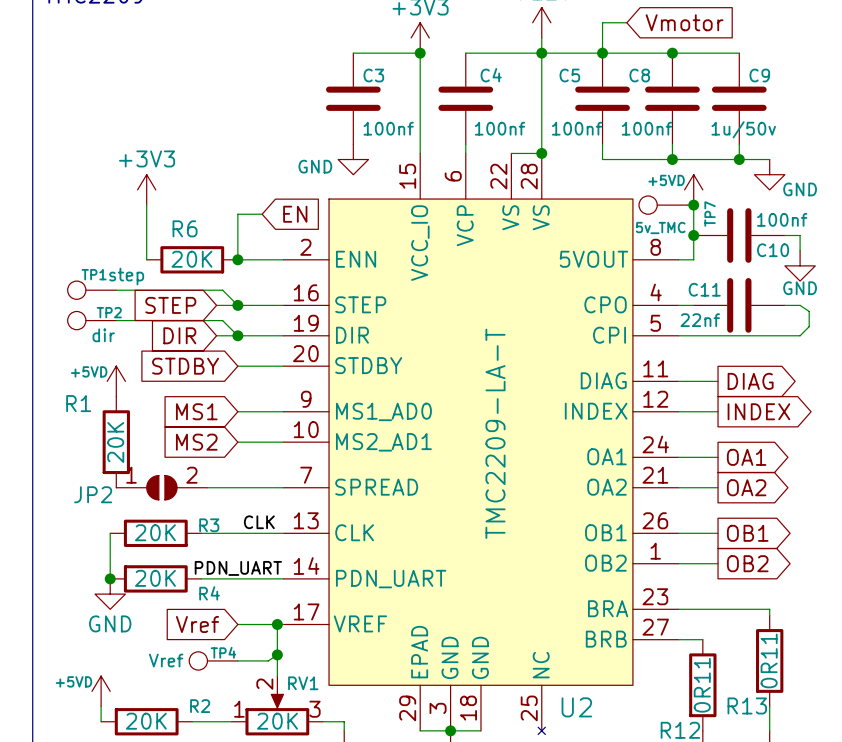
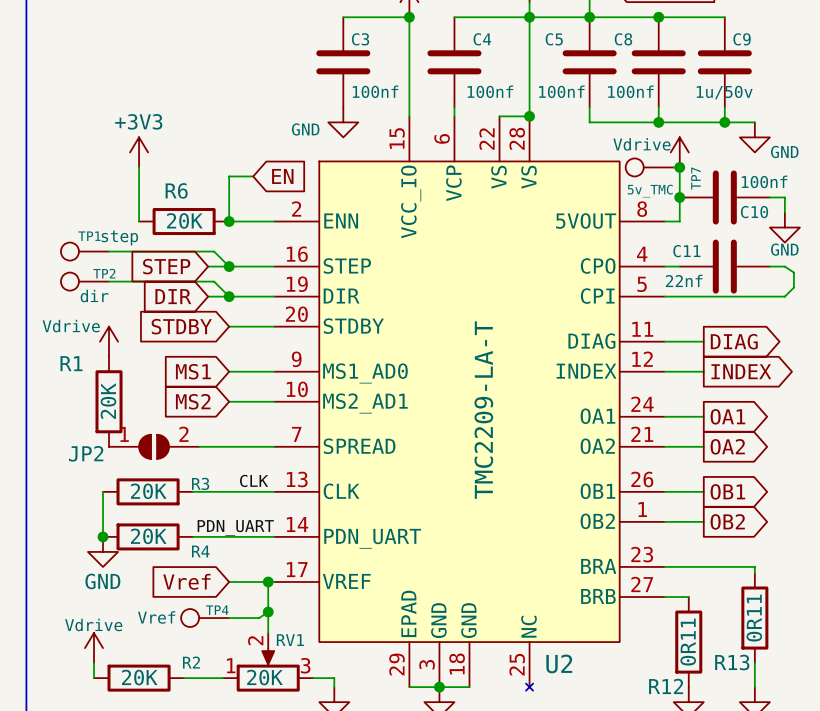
power symbol: +5VD (693, 189) -> Vdrive (679, 152)
power symbol: +5VD (116, 381) -> Vdrive (109, 341)
power symbol: +5VD (101, 691) -> Vdrive (93, 648)

